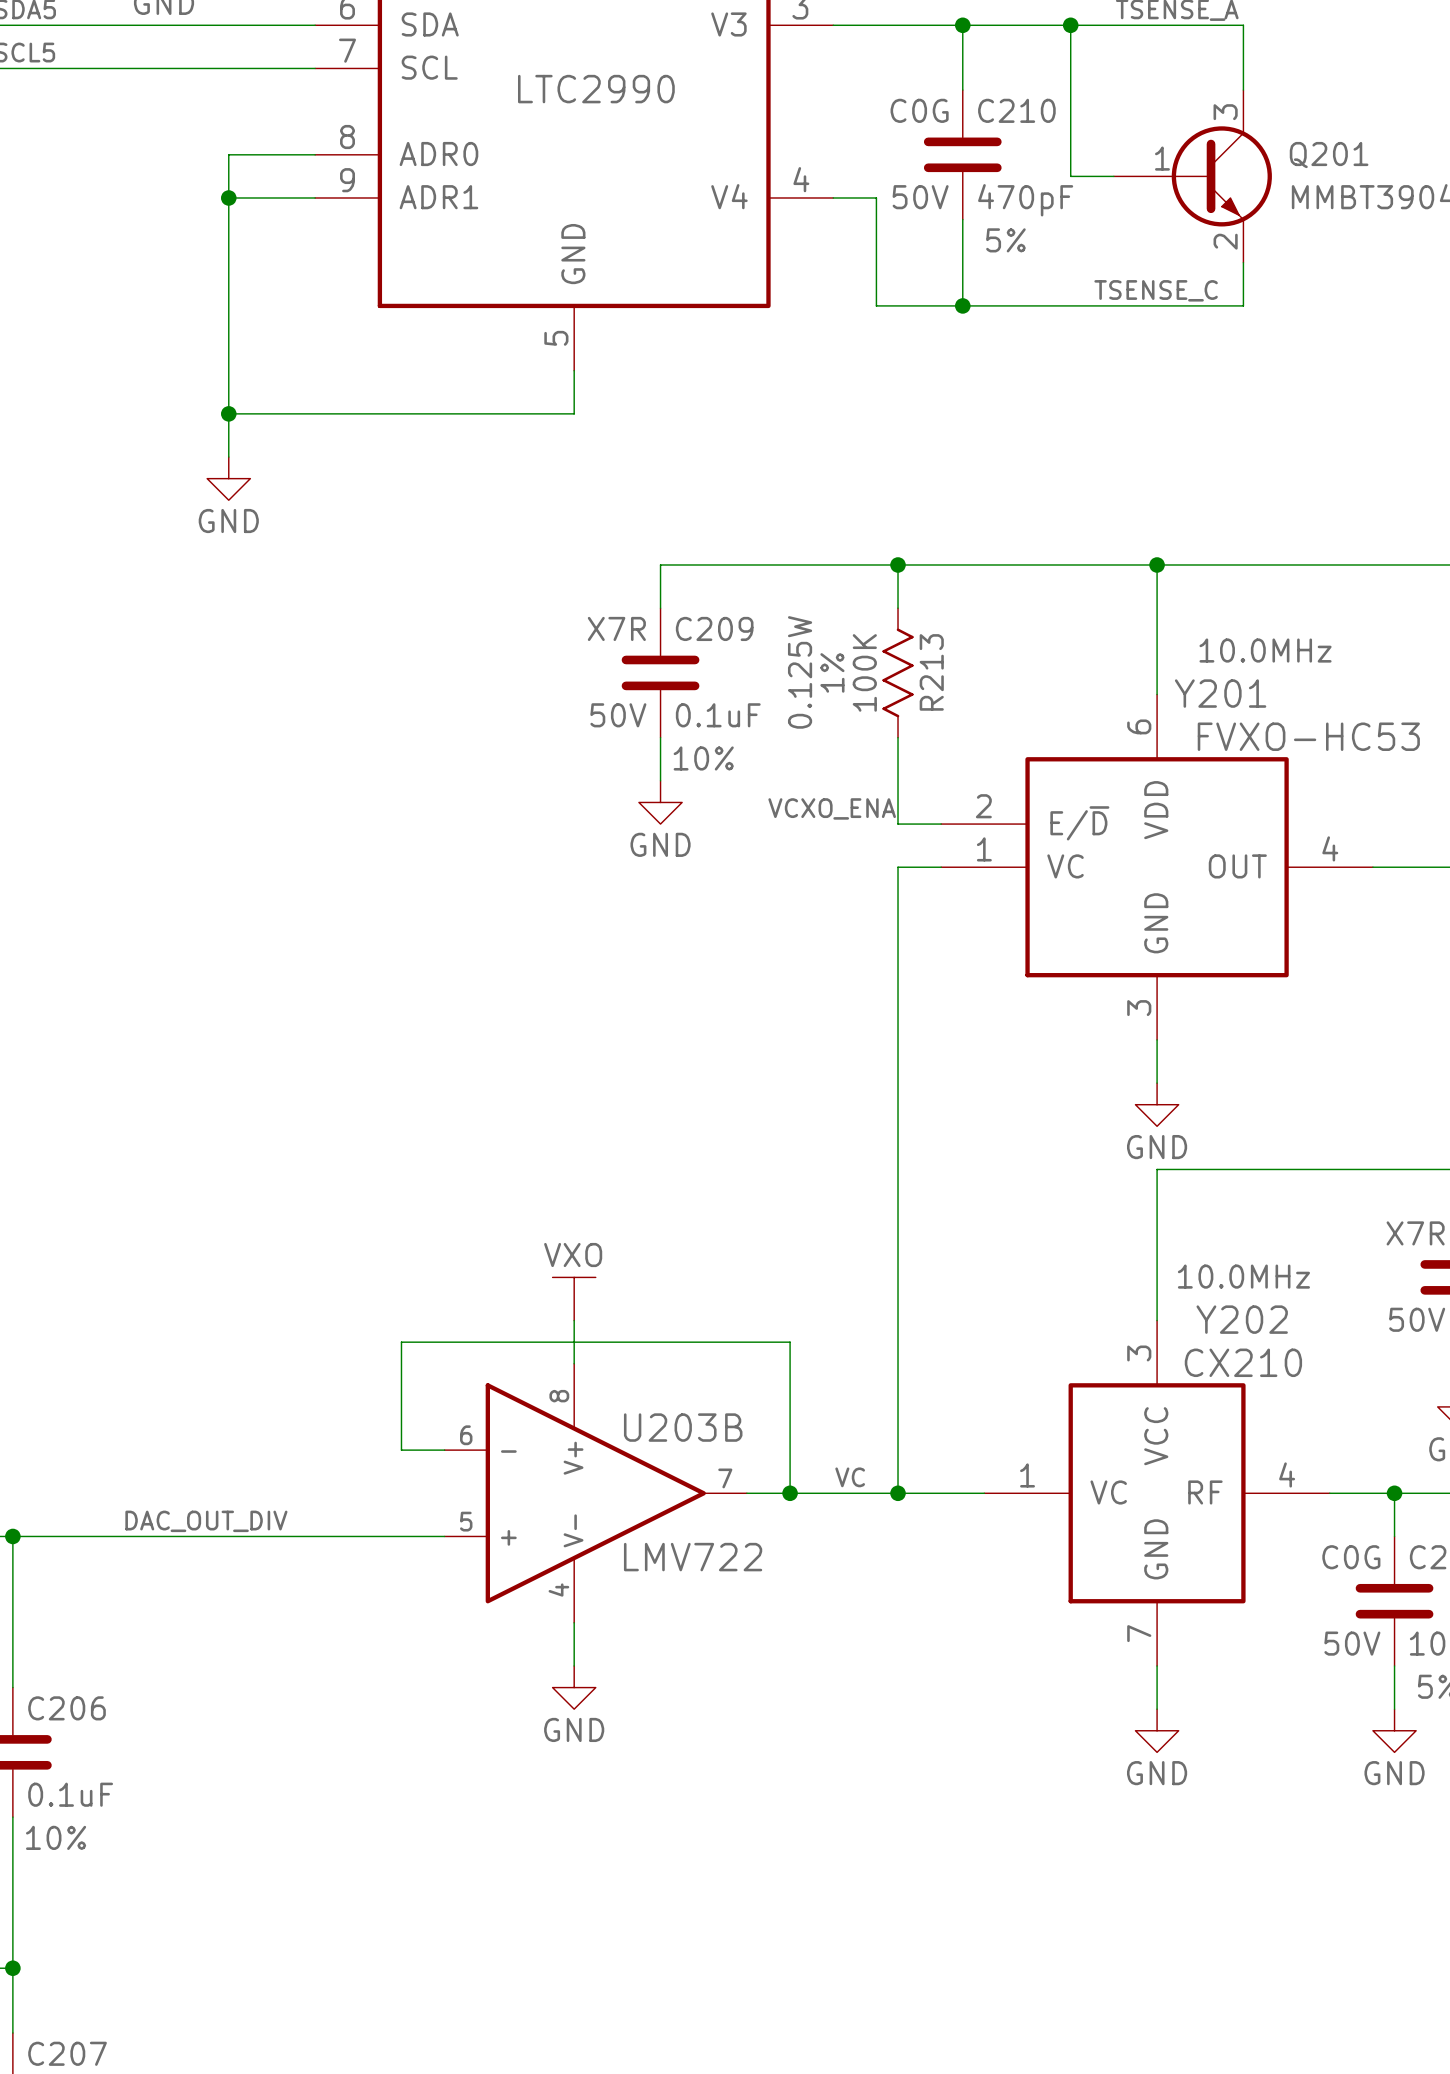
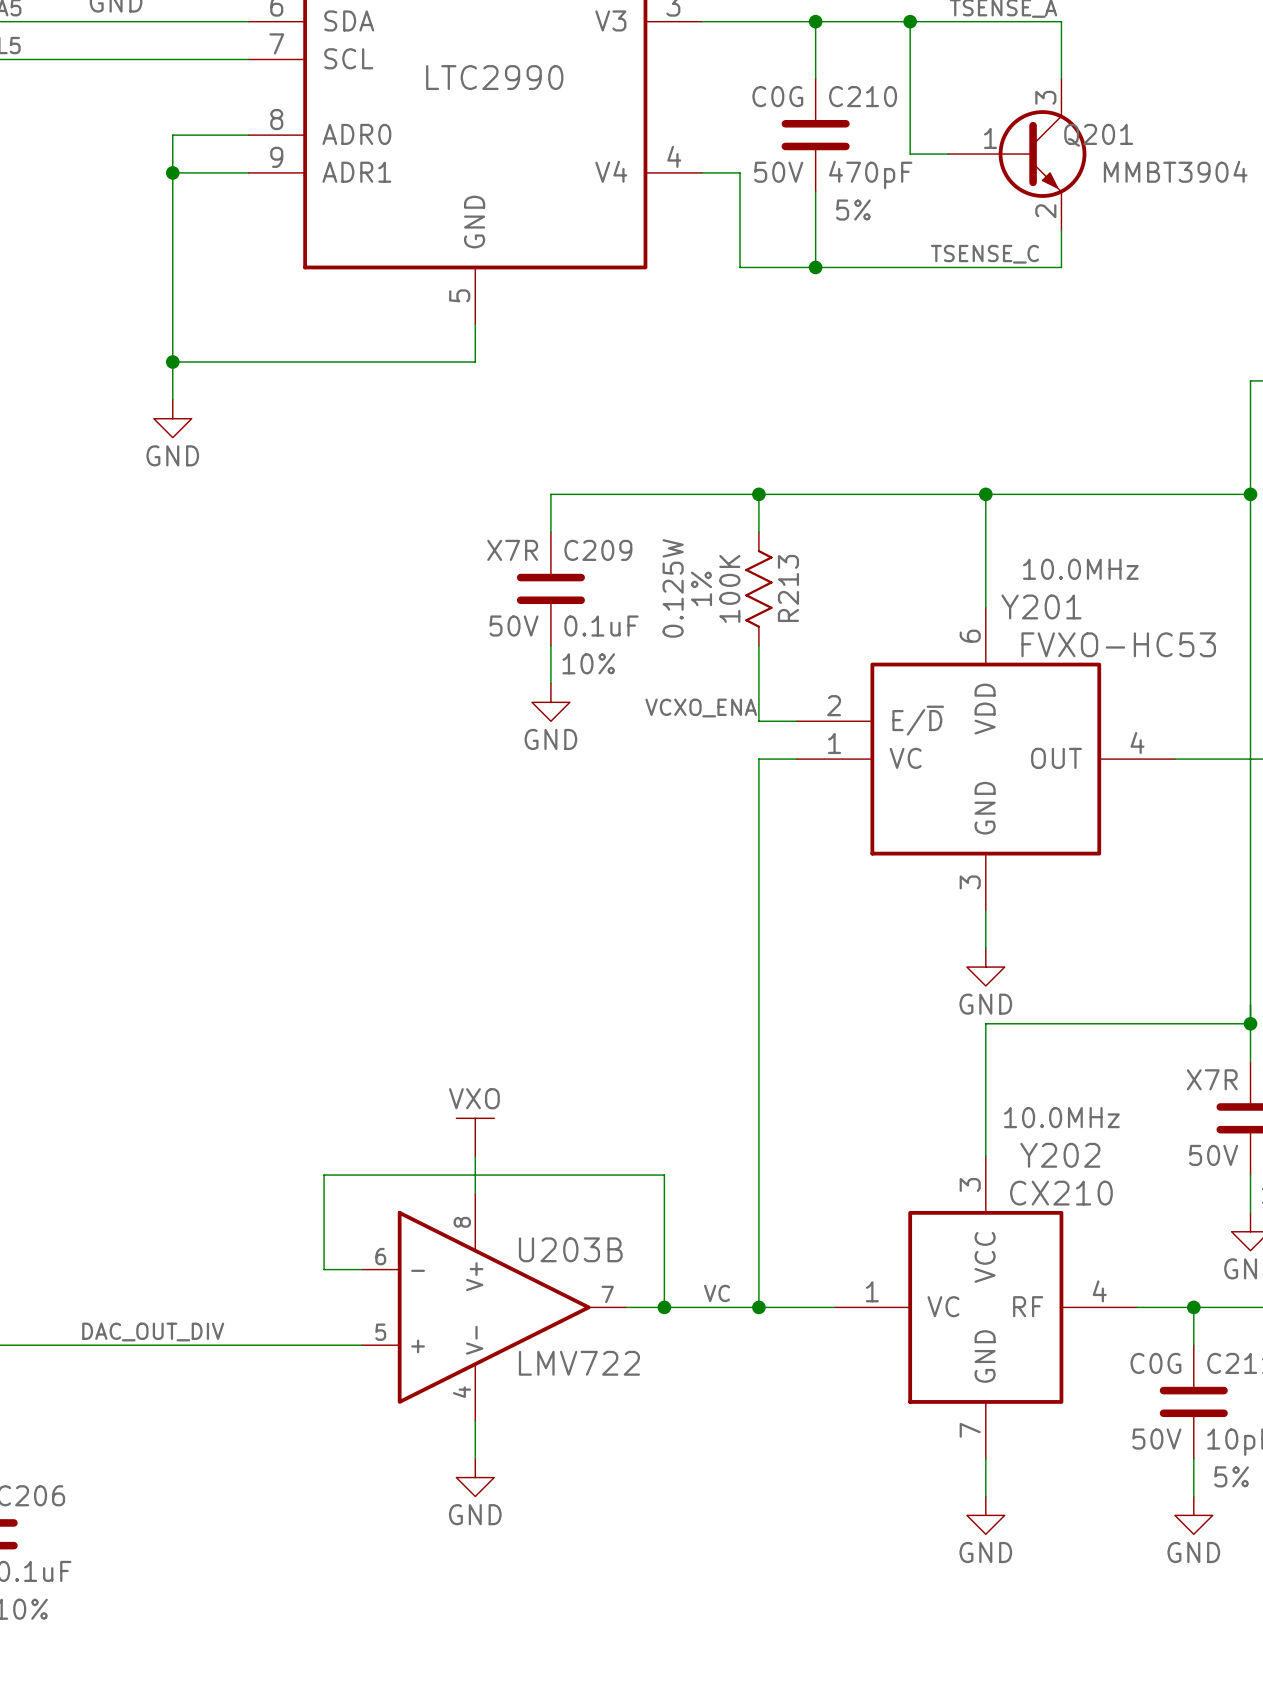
Q201 name position: Q201 (1329, 155) -> Q201 (1098, 135)

